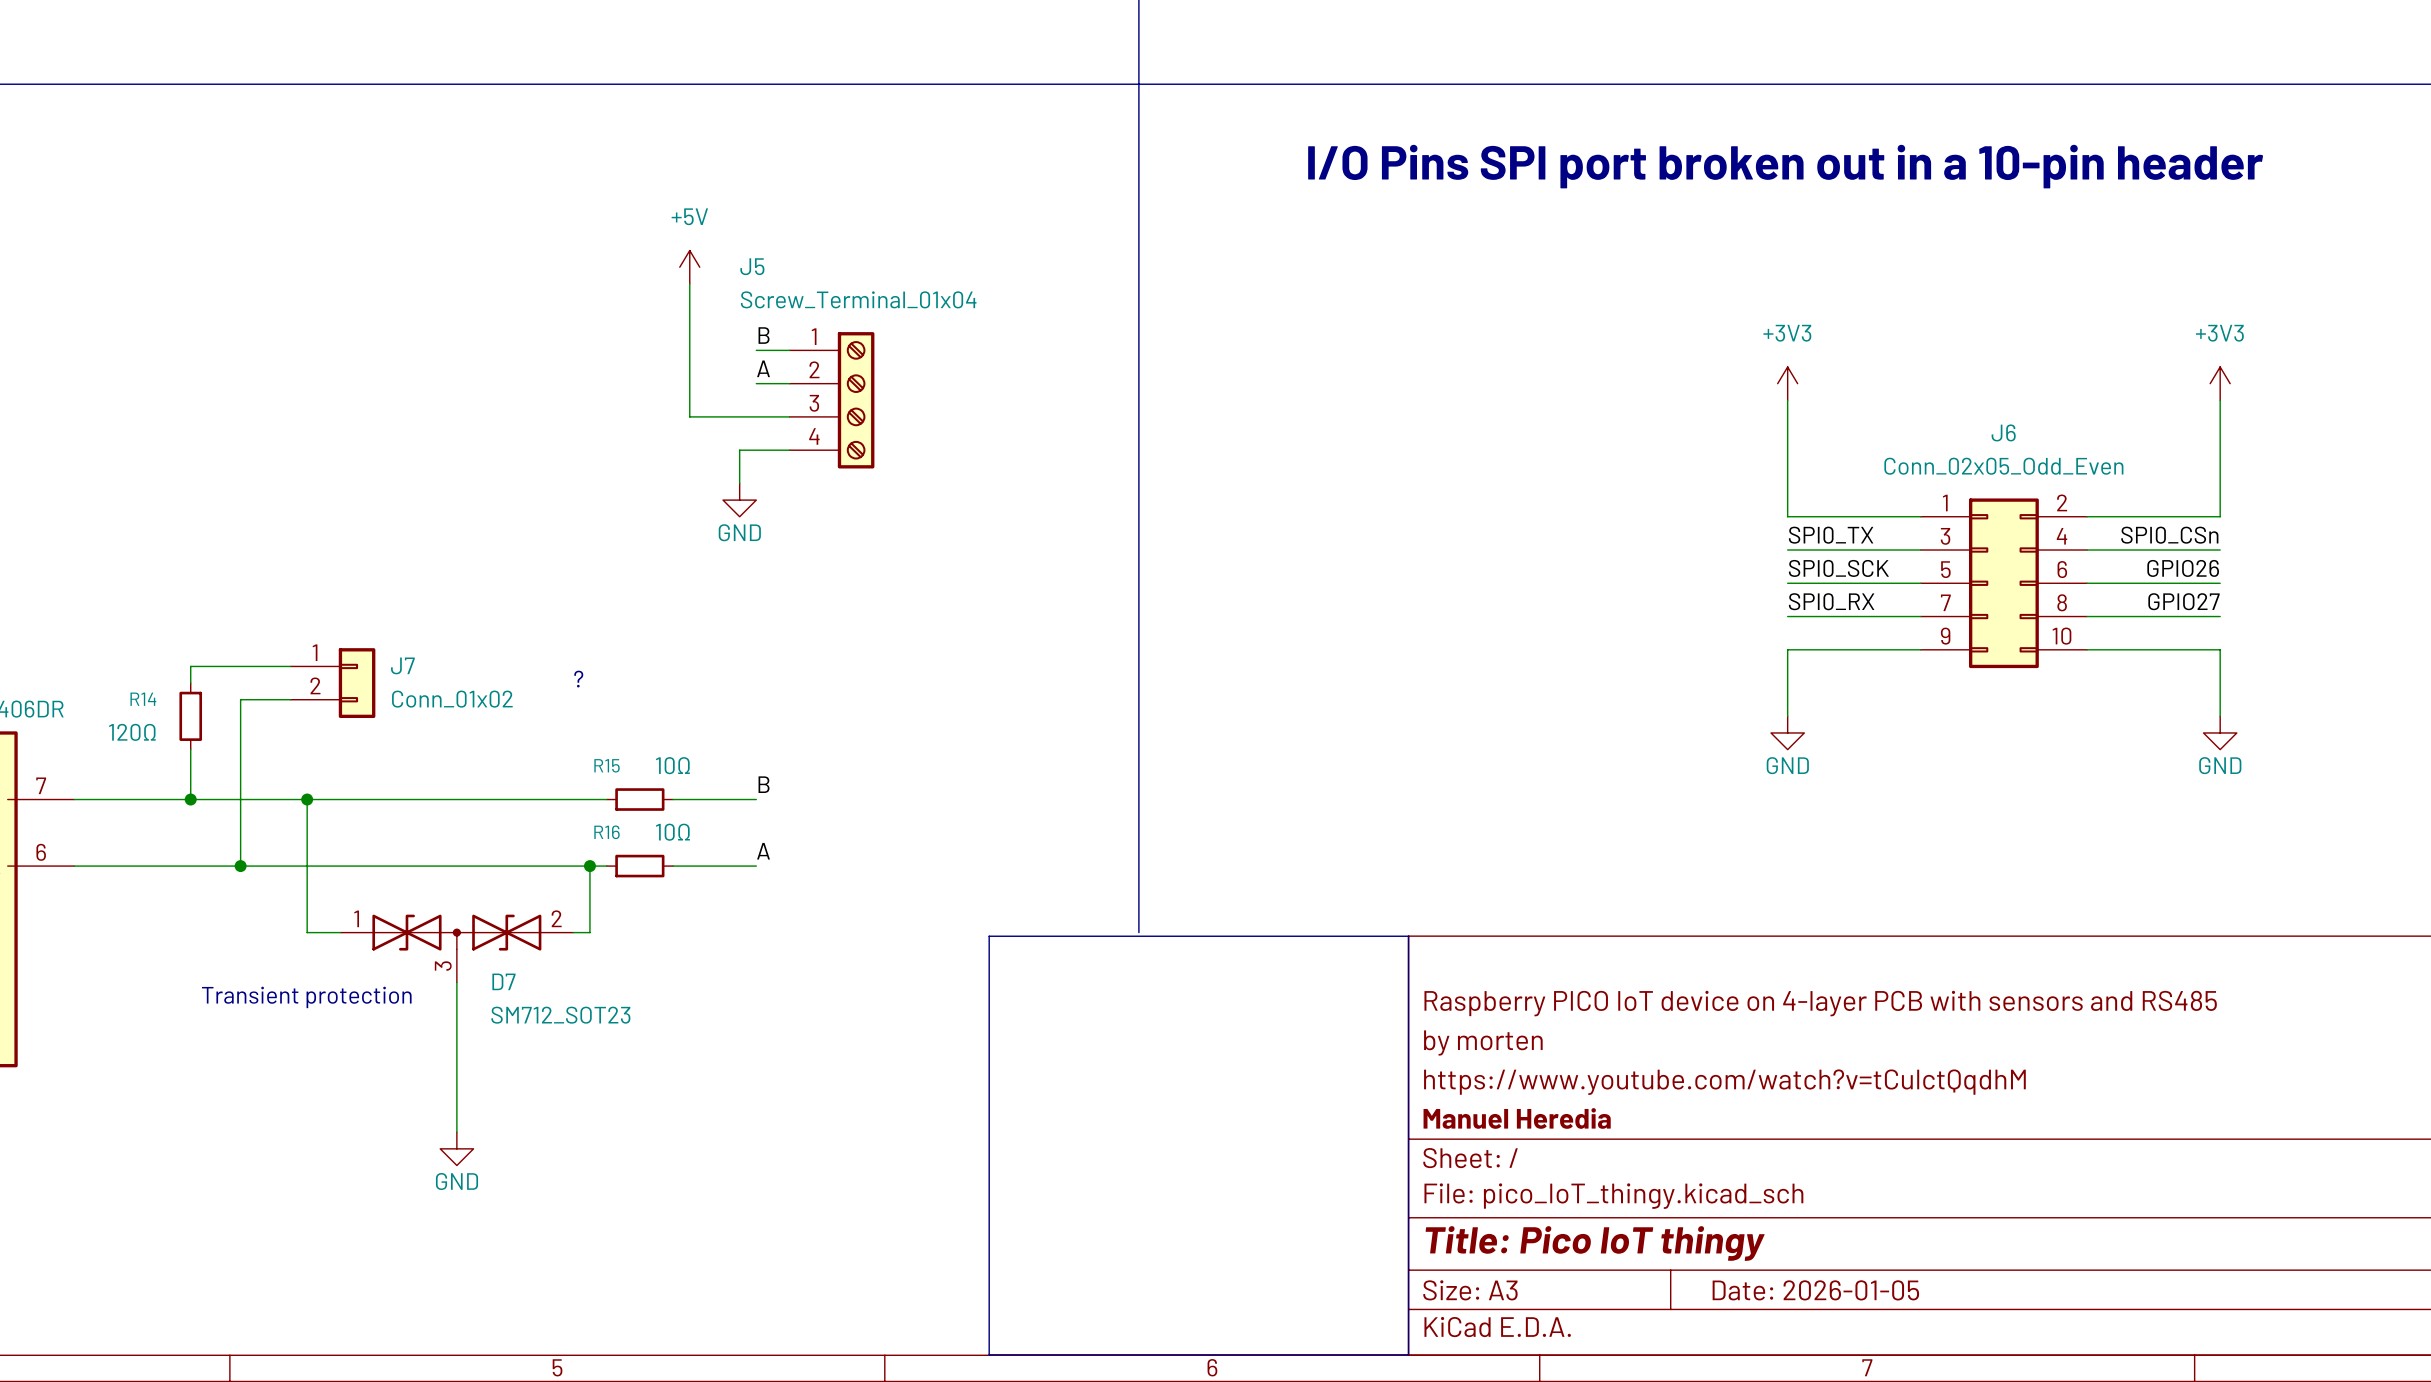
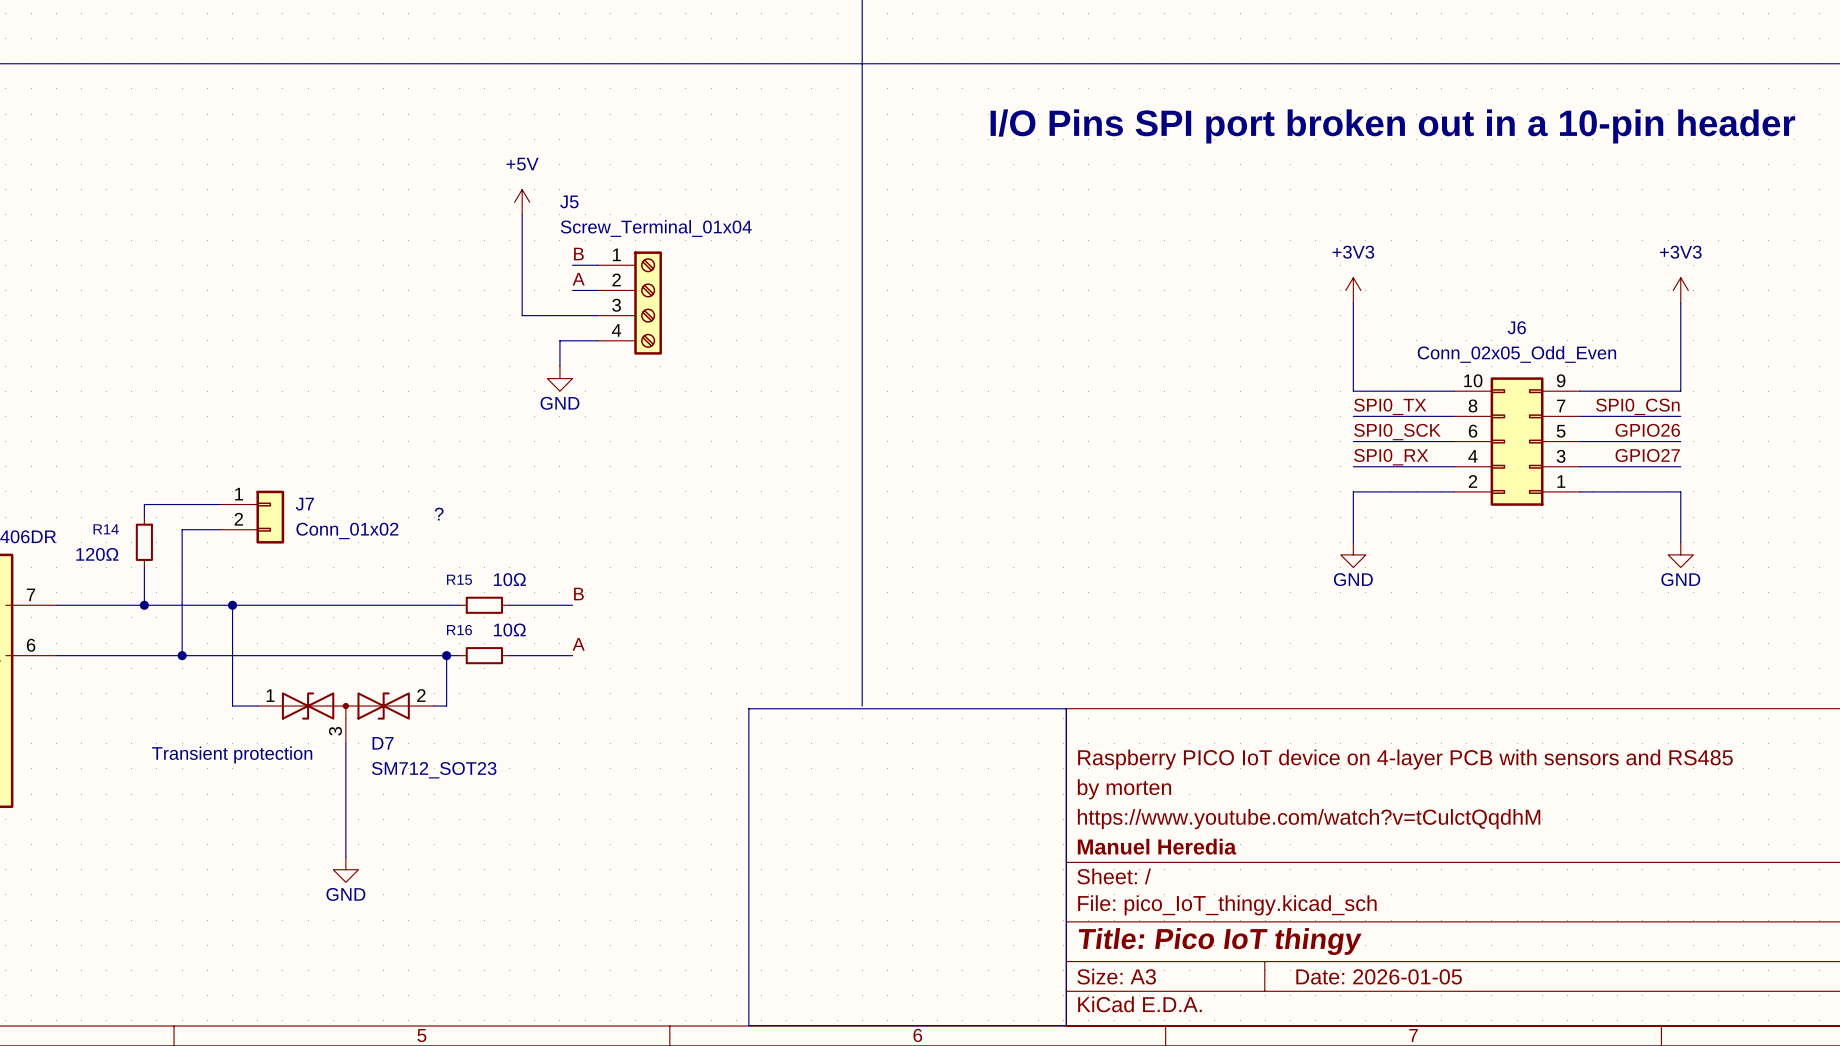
J6 rotation: 0° (2003, 583) -> 180° (1517, 441)

